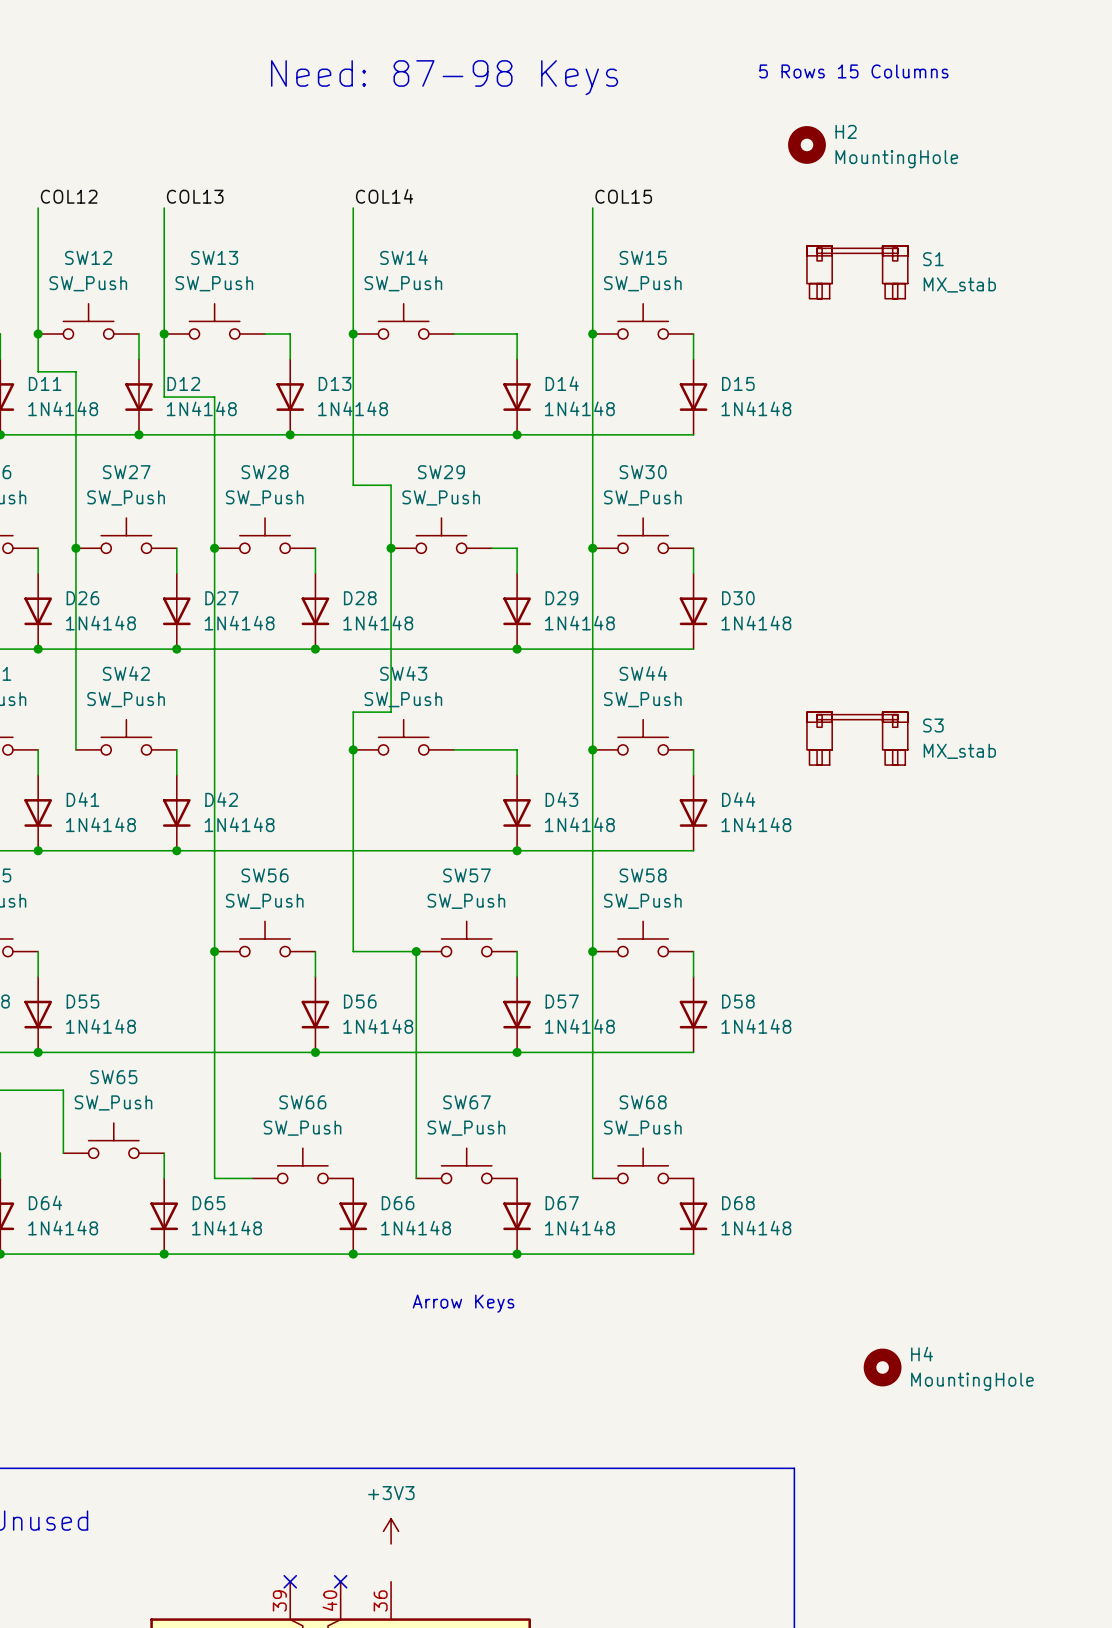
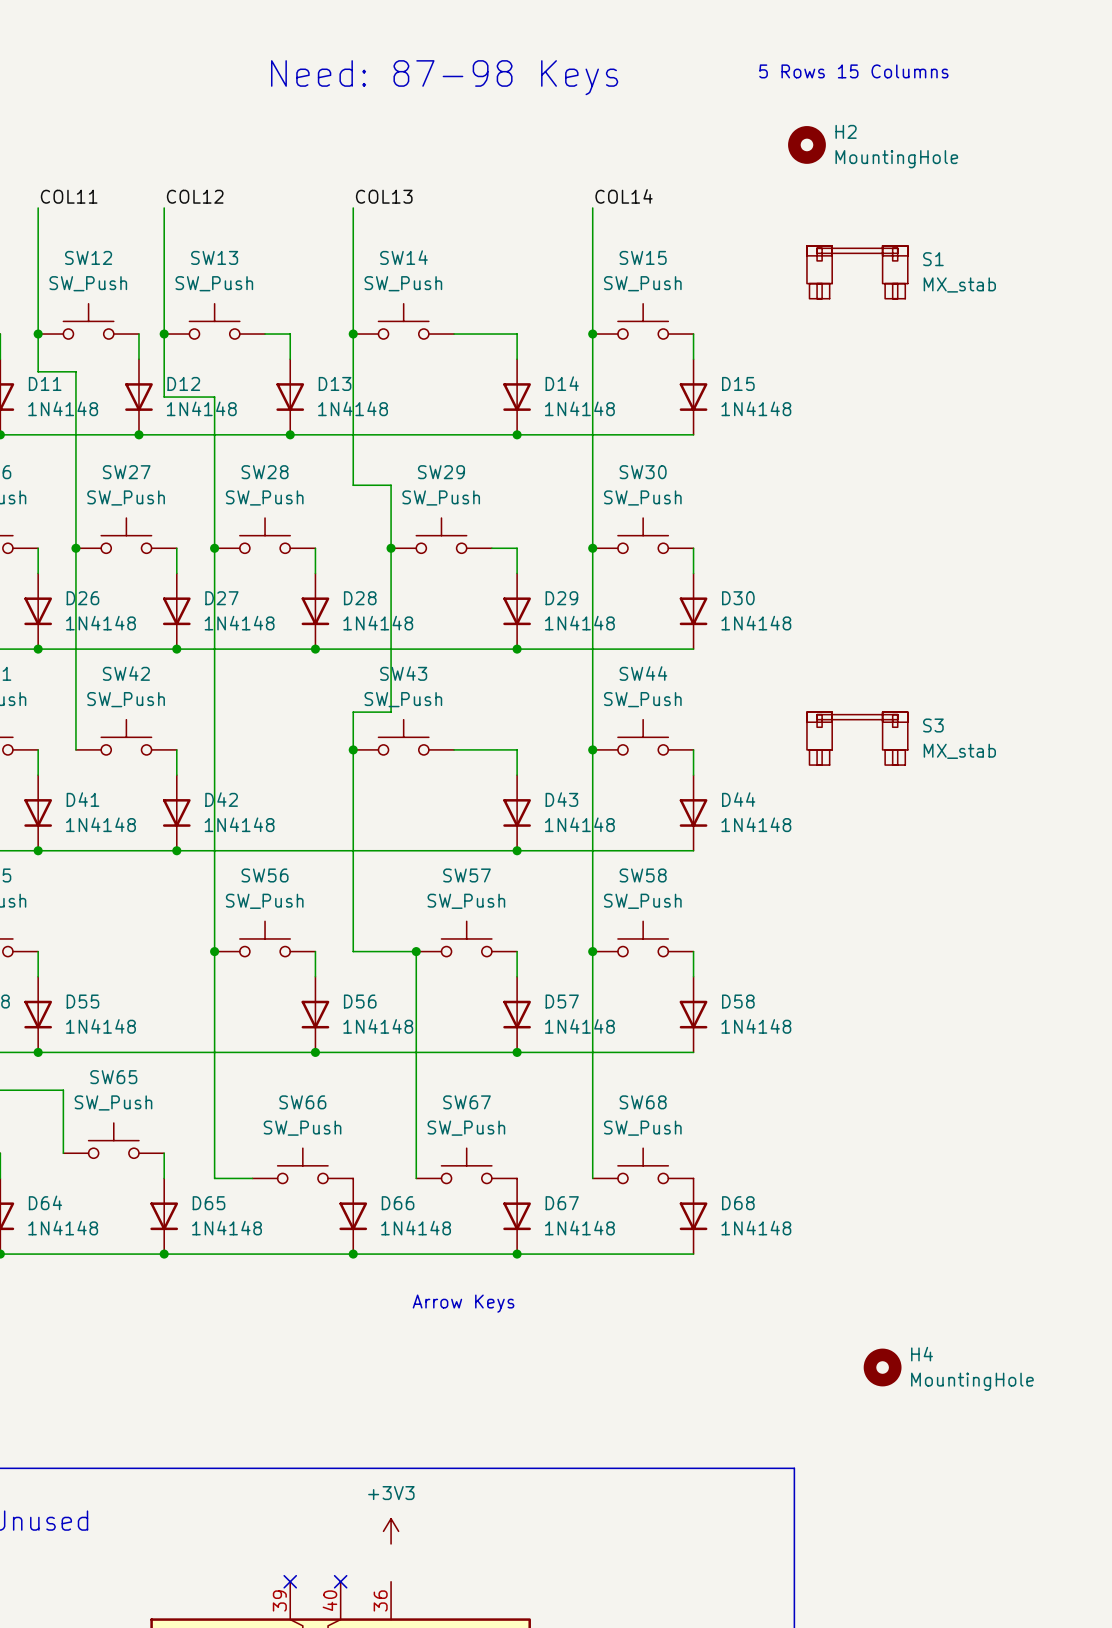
label: COL12 (69, 196) -> COL11 (69, 196)
label: COL13 (195, 196) -> COL12 (195, 196)
label: COL14 (384, 196) -> COL13 (384, 196)
label: COL15 (623, 196) -> COL14 (624, 196)

